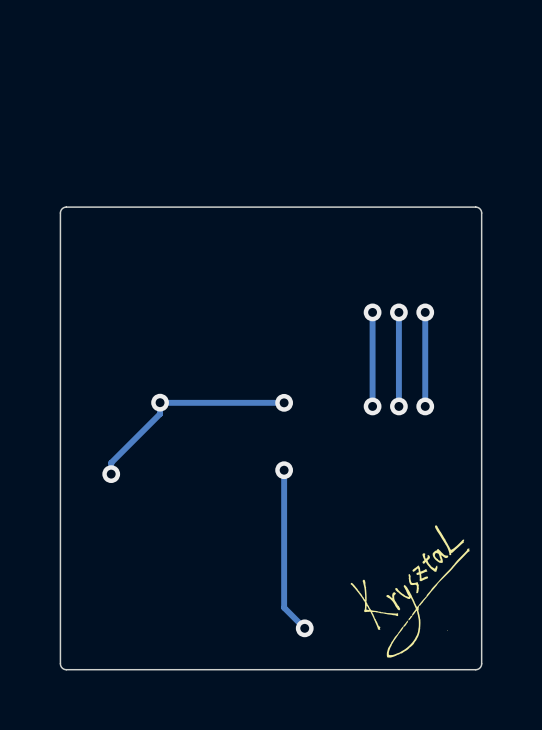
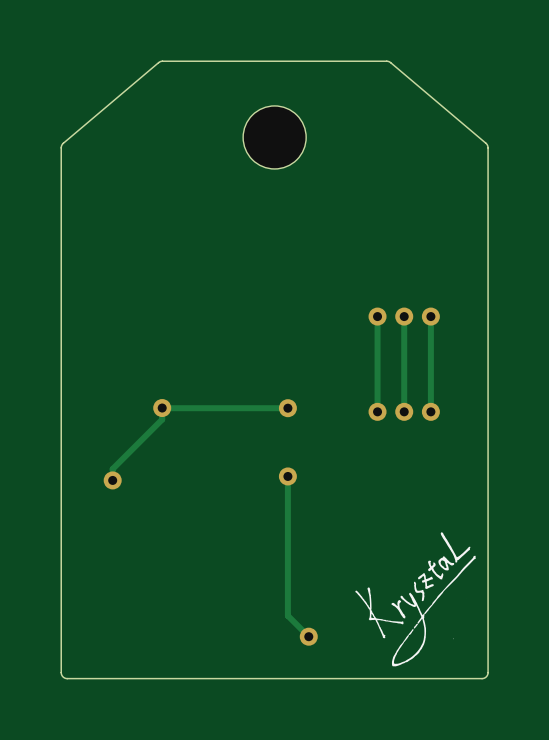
part: none -> (274, 137)
board edge: (481, 213) (479, 208) (475, 207) (66, 207) (62, 208) (60, 213) -> (488, 215) (487, 144) (386, 61) (159, 61) (62, 144) (61, 215)

